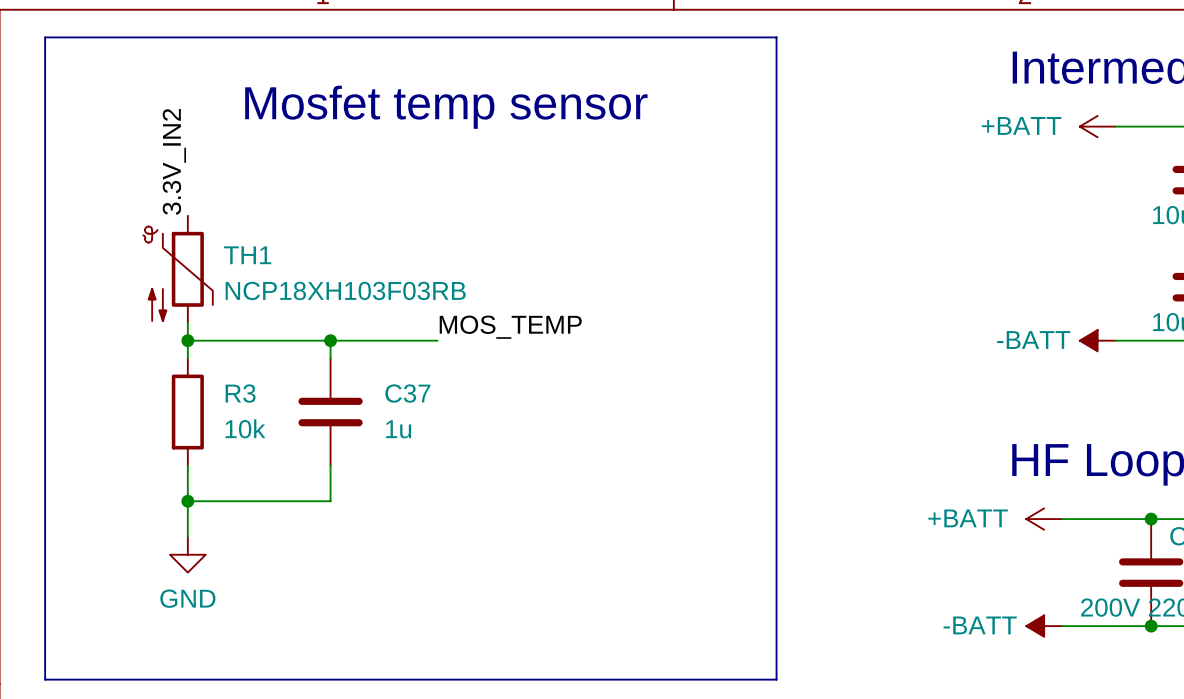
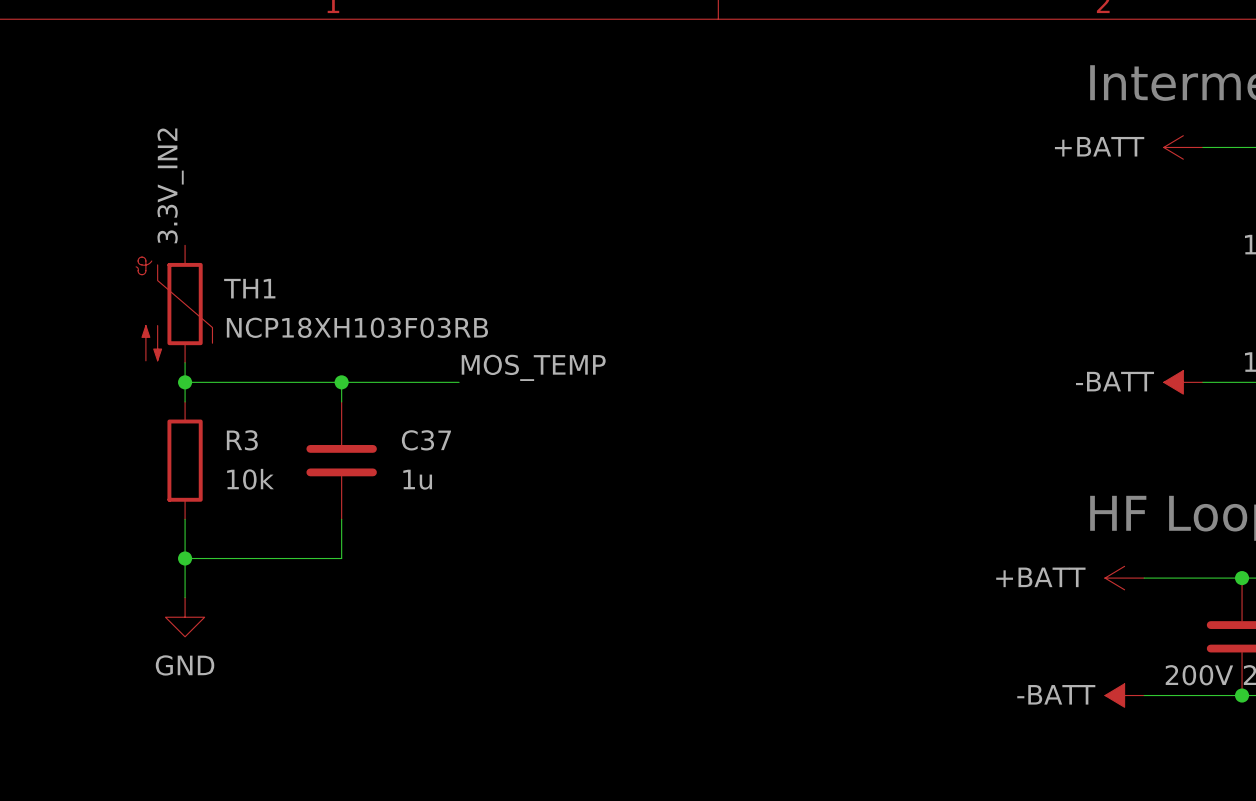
line: (45, 37) (776, 37) (776, 679) (45, 679) (45, 37) -> none
text: Mosfet temp sensor (446, 107) -> none

